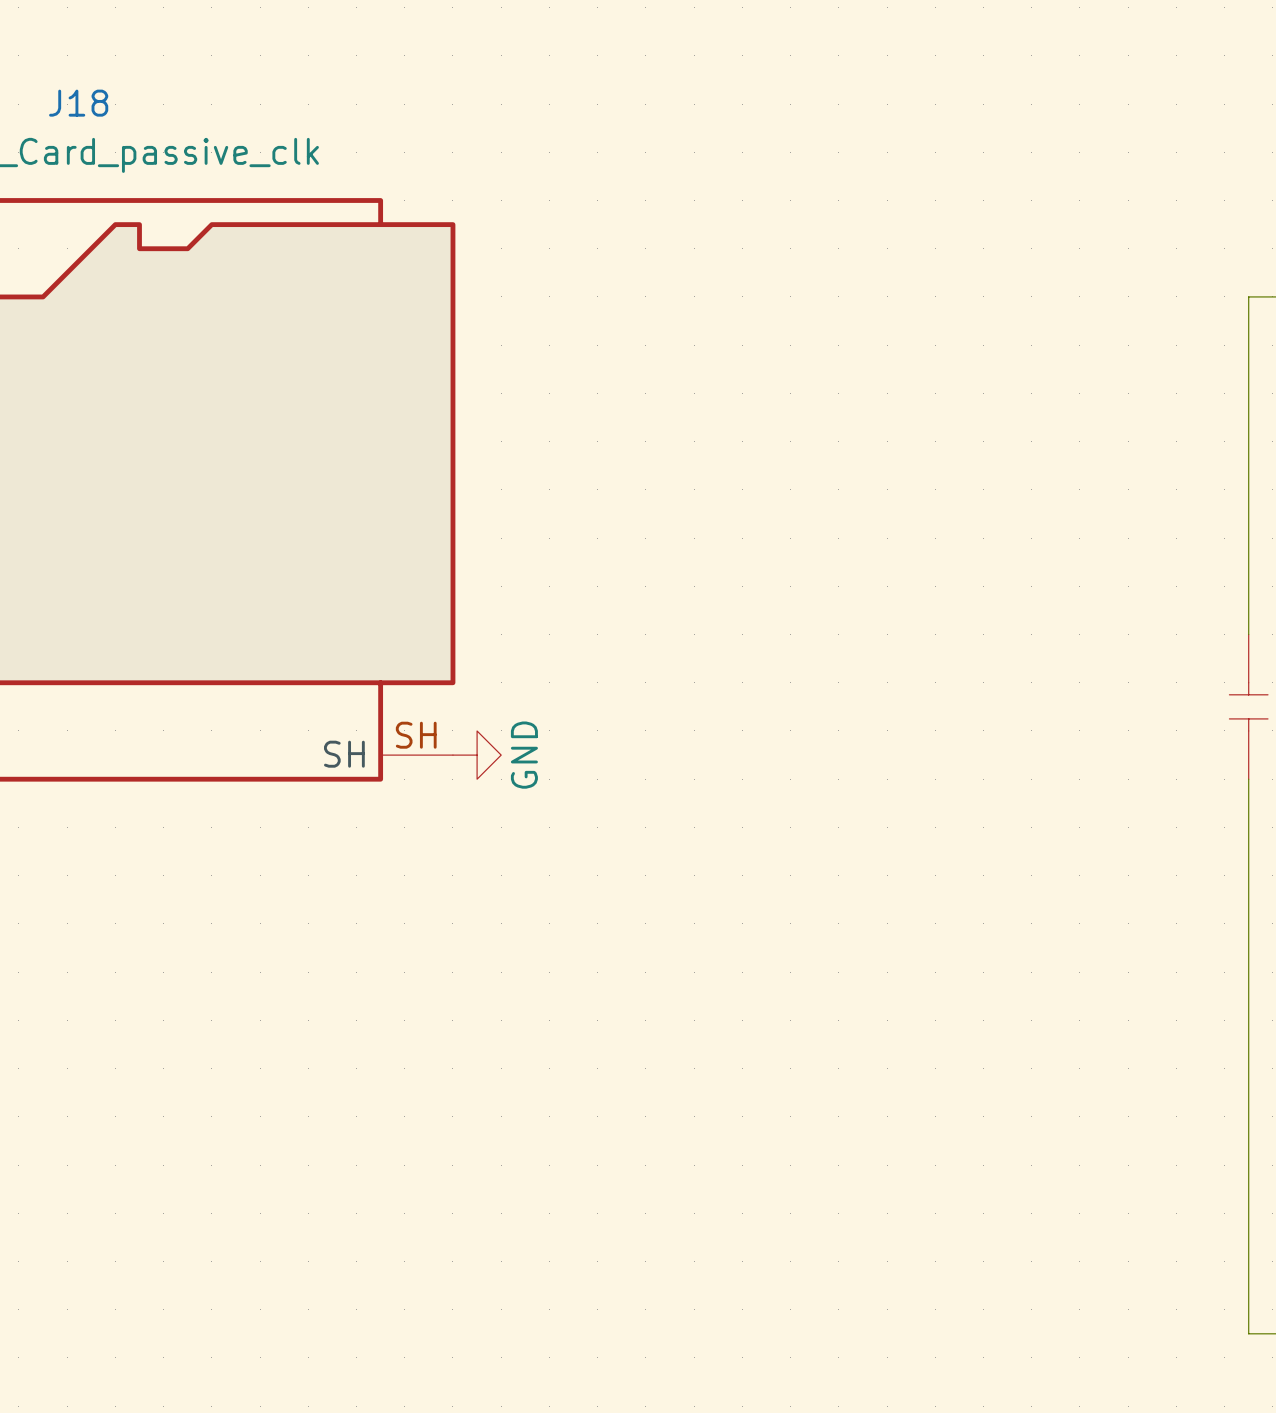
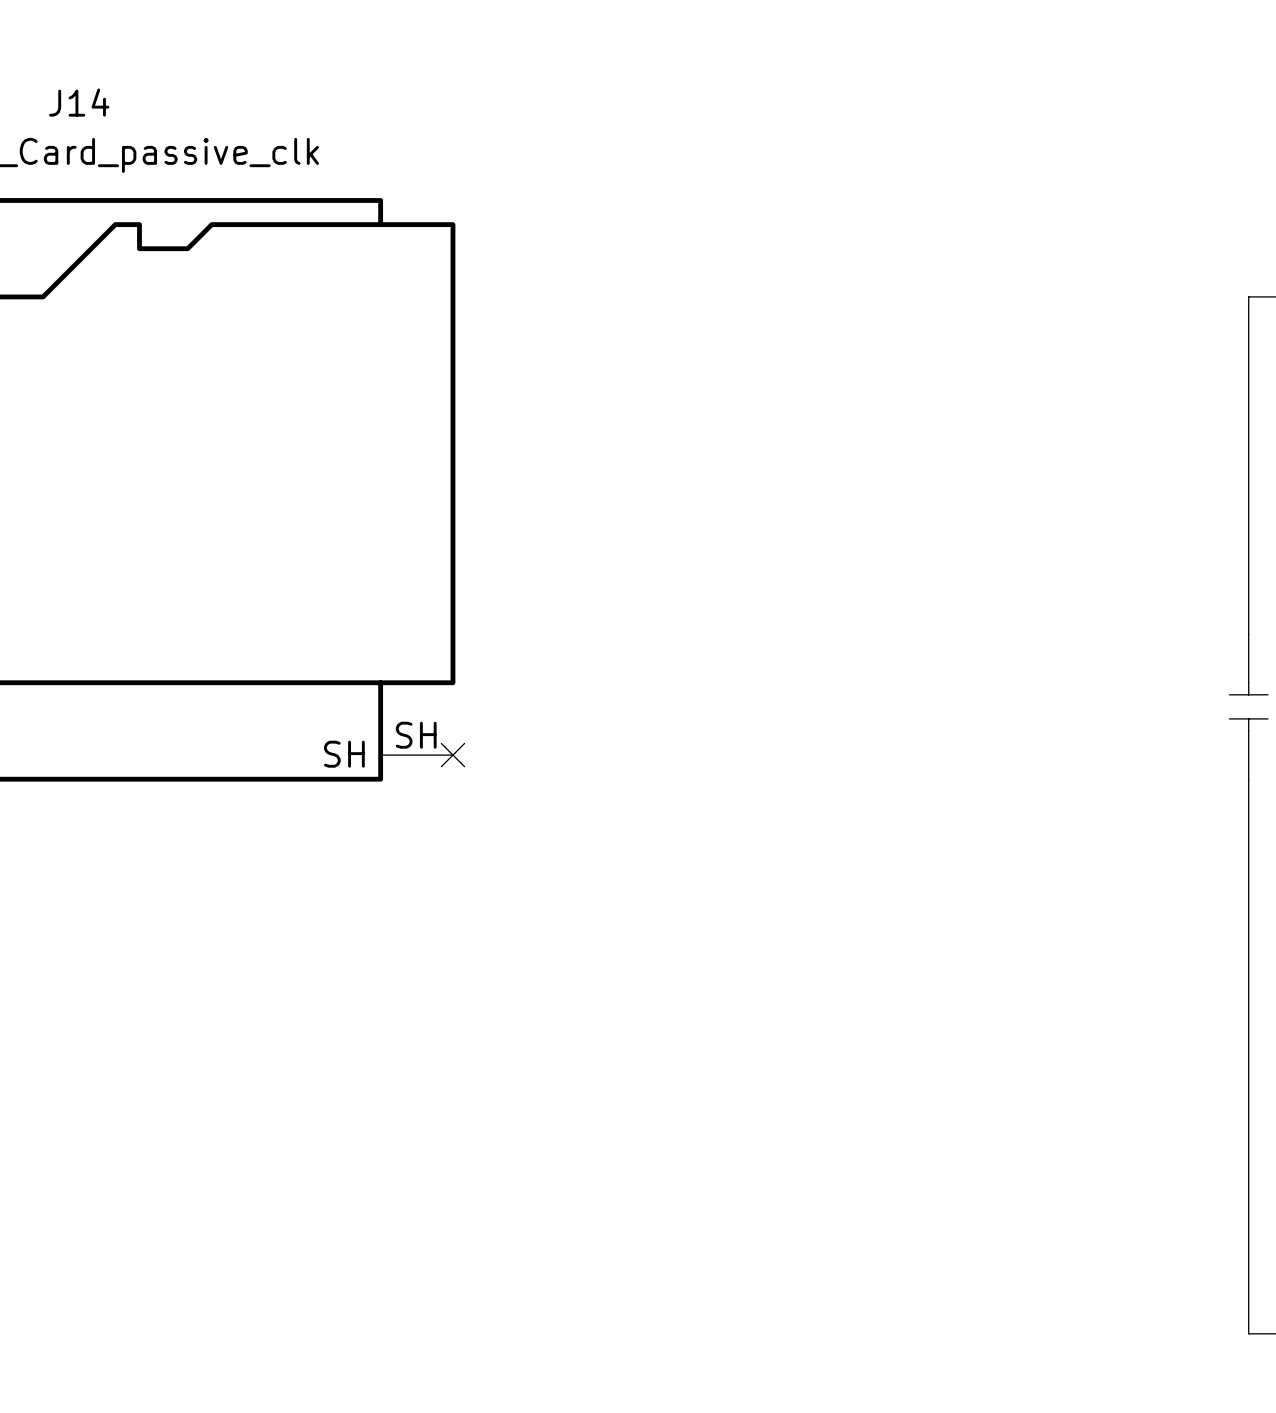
J18 name: J18 (78, 103) -> J14 (79, 102)
no-connect mark: none -> (452, 755)
power symbol: GND (477, 755) -> none

